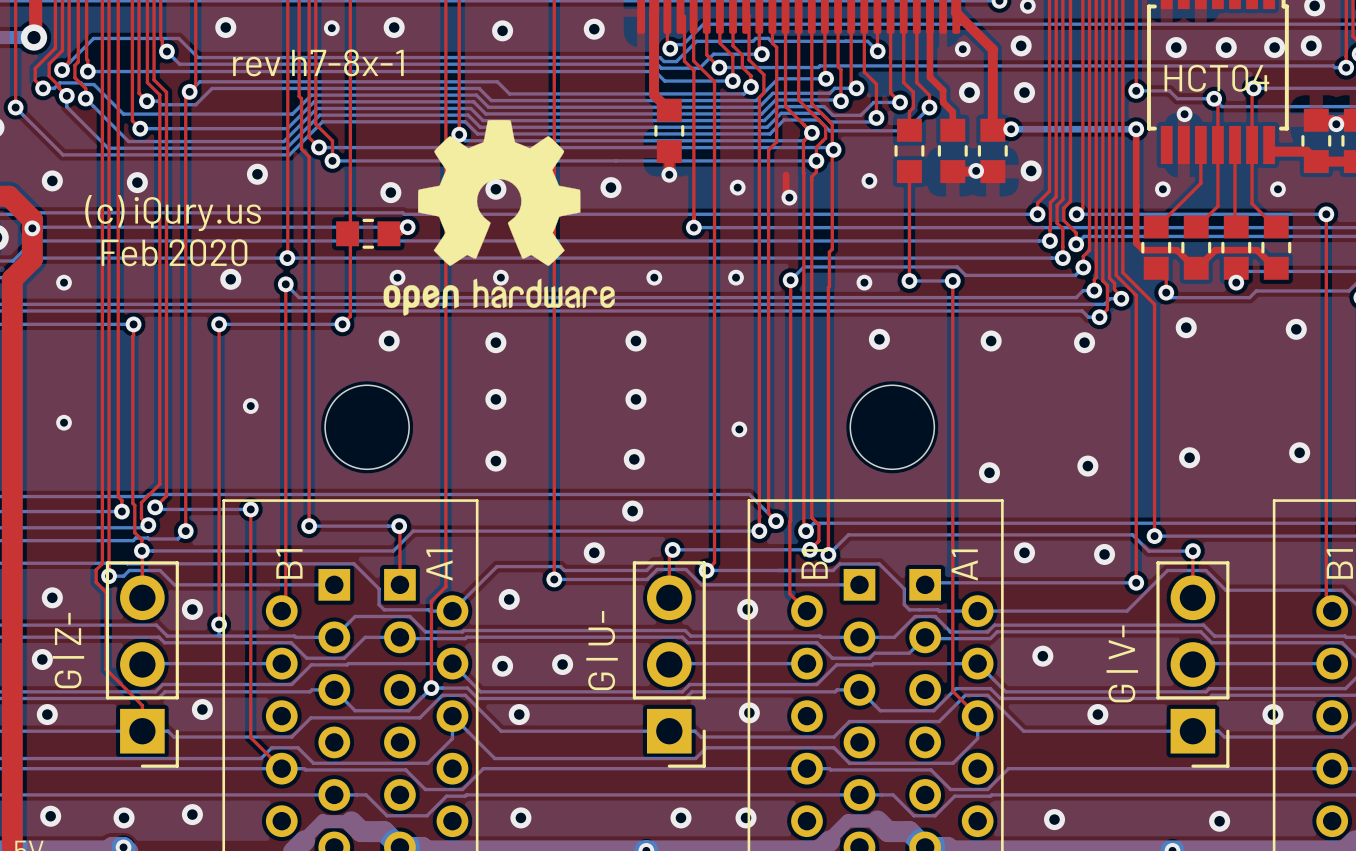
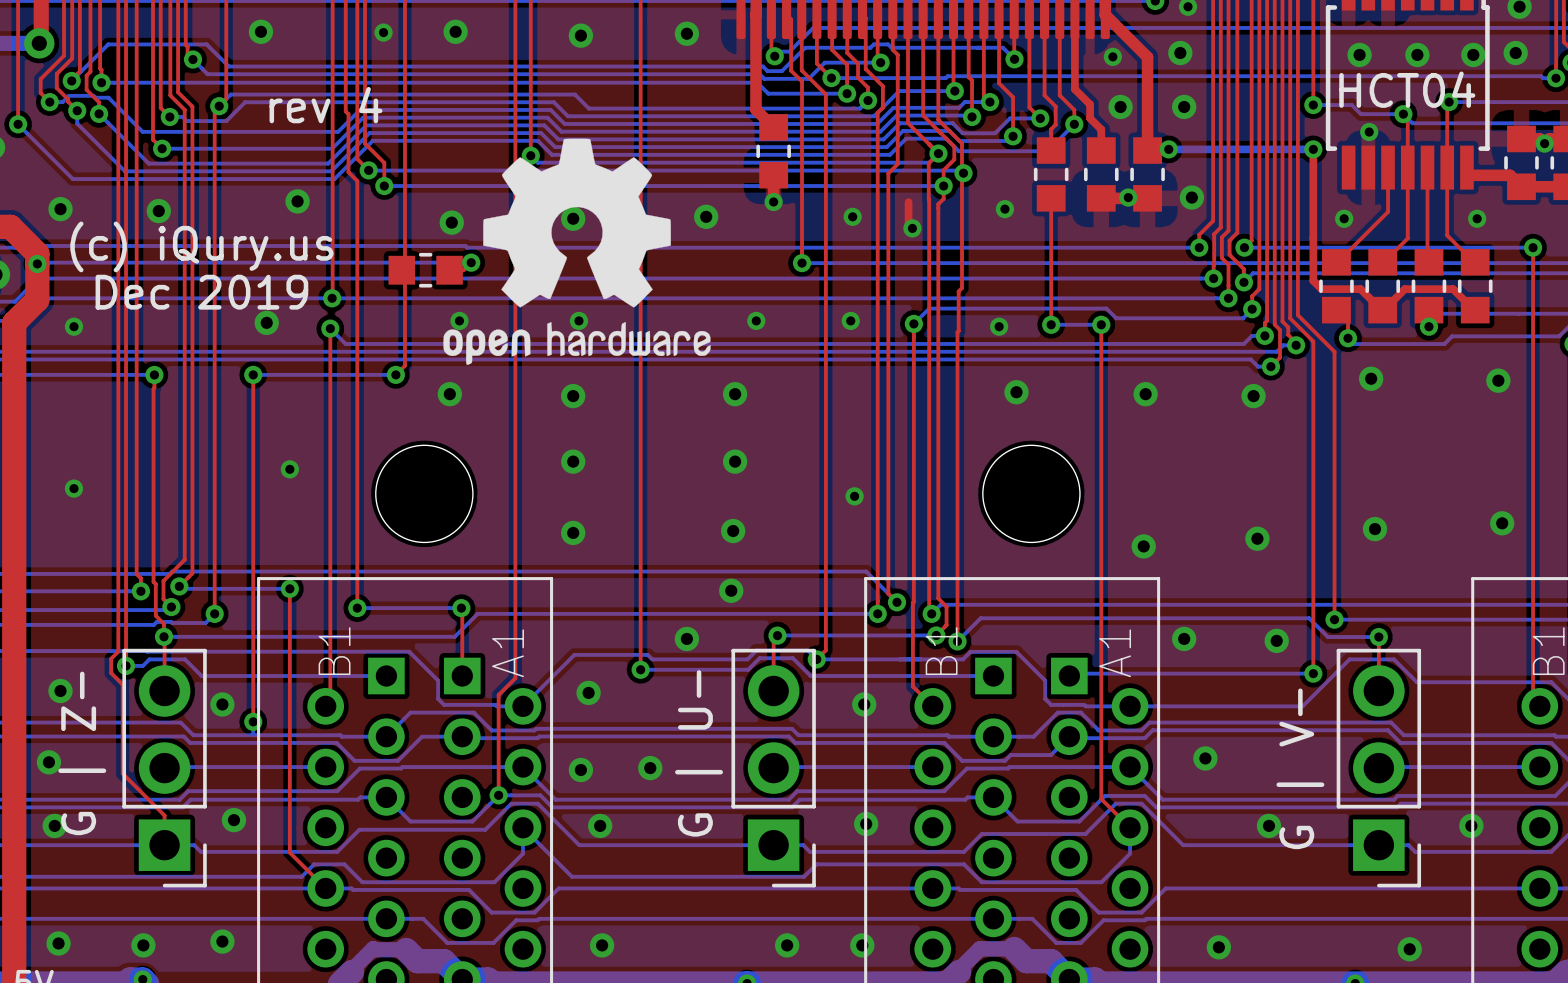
text: rev h7-8x-1 (318, 62) -> none
text: none -> rev 4 (326, 105)
text: Feb 2020 (174, 252) -> Dec 2019 (201, 292)

